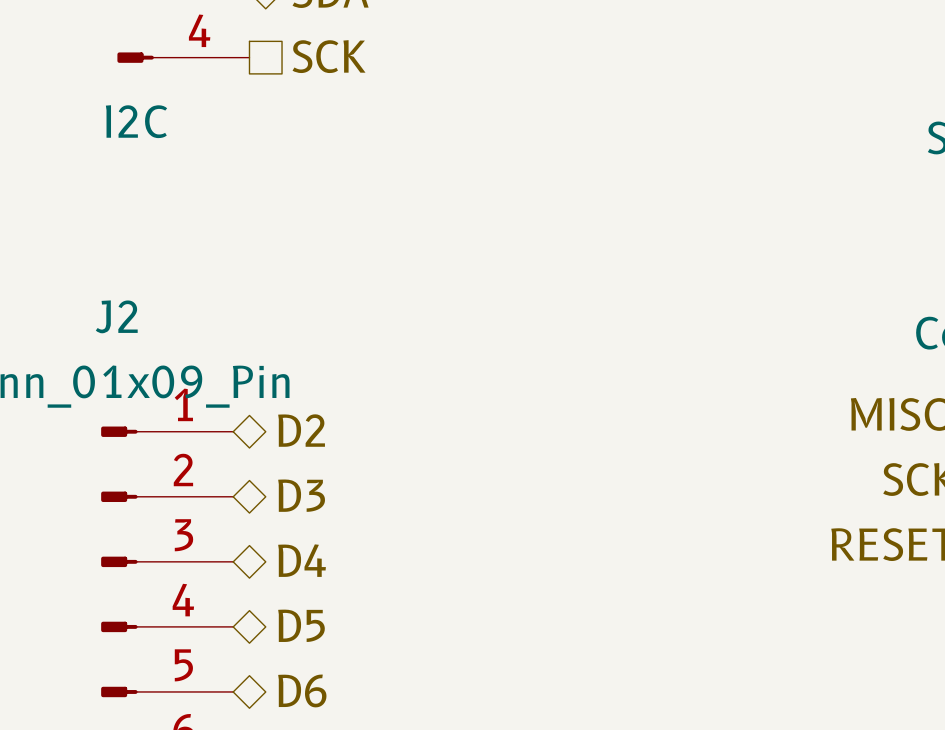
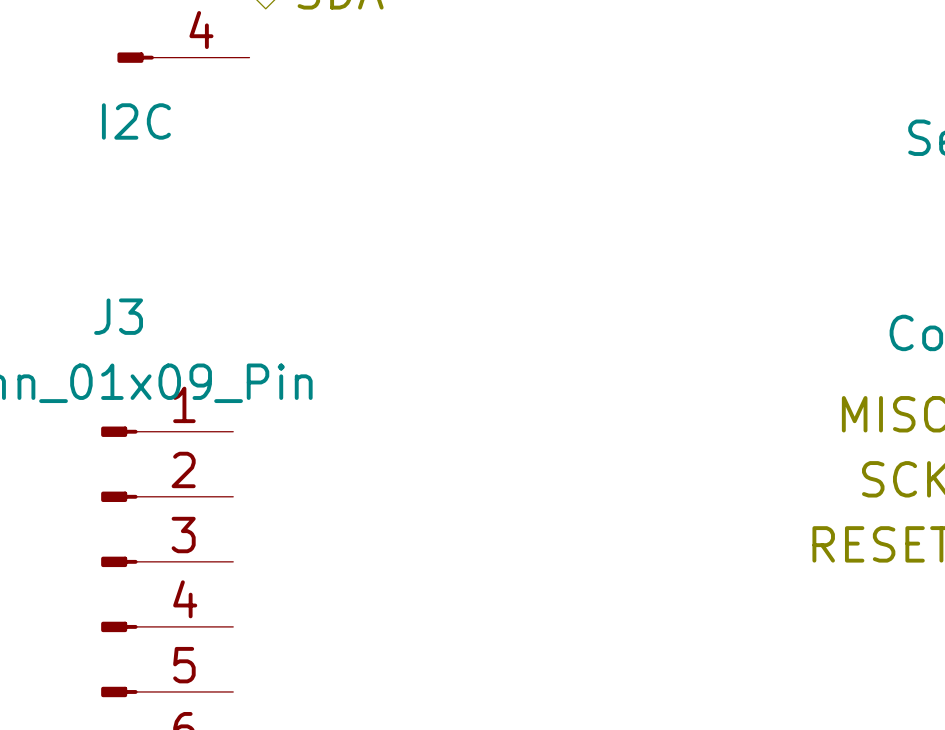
hierarchical label: SCK (329, 56) -> none
J2 name: J2 (116, 316) -> J3 (118, 316)
hierarchical label: D2 (301, 430) -> none
hierarchical label: D3 (301, 495) -> none
hierarchical label: D4 (302, 560) -> none
hierarchical label: D5 (301, 625) -> none
hierarchical label: D6 (302, 690) -> none

